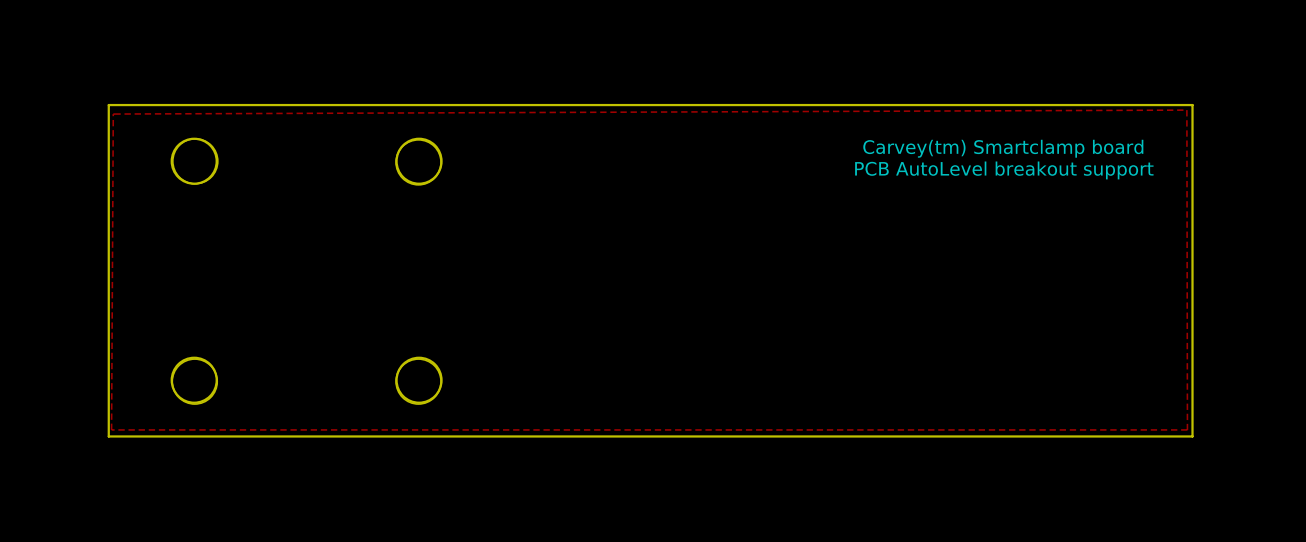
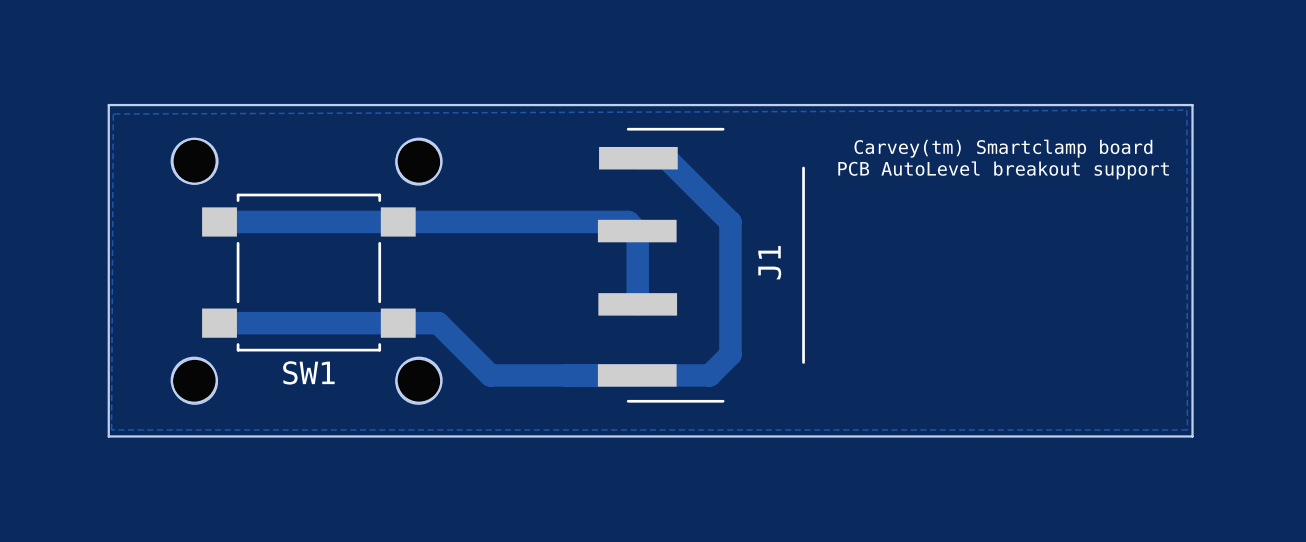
track: none -> (638, 158) (666, 158) (730, 222) (730, 354) (709, 375) (490, 375) (438, 323) (219, 323)
track: none -> (219, 221) (628, 221) (637, 231) (637, 304)
J1: none -> (701, 265)
SW1: none -> (308, 272)

